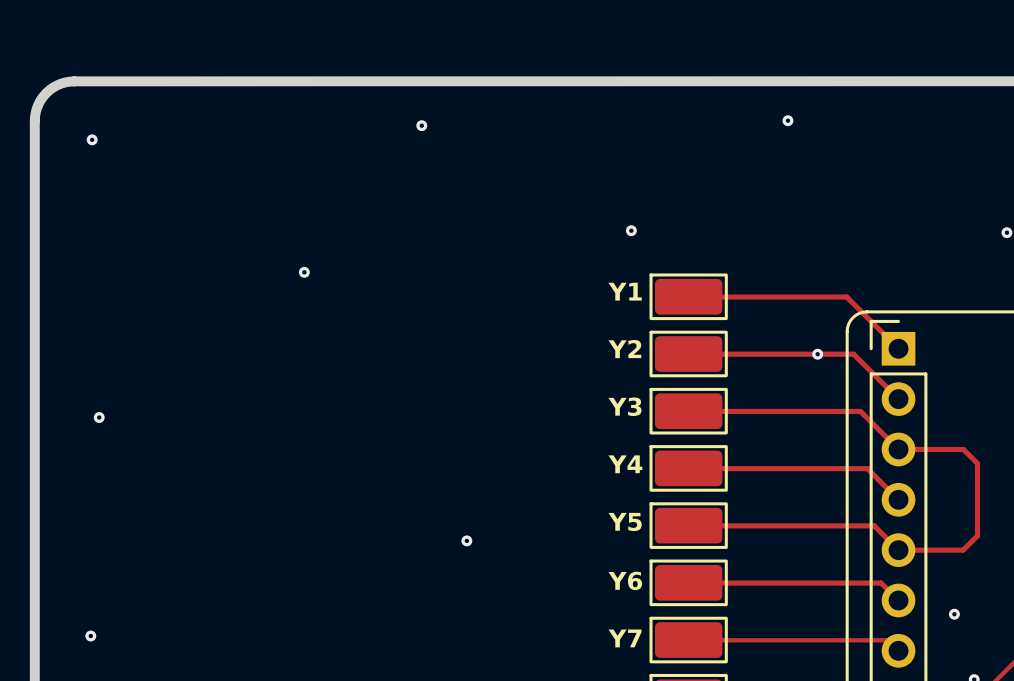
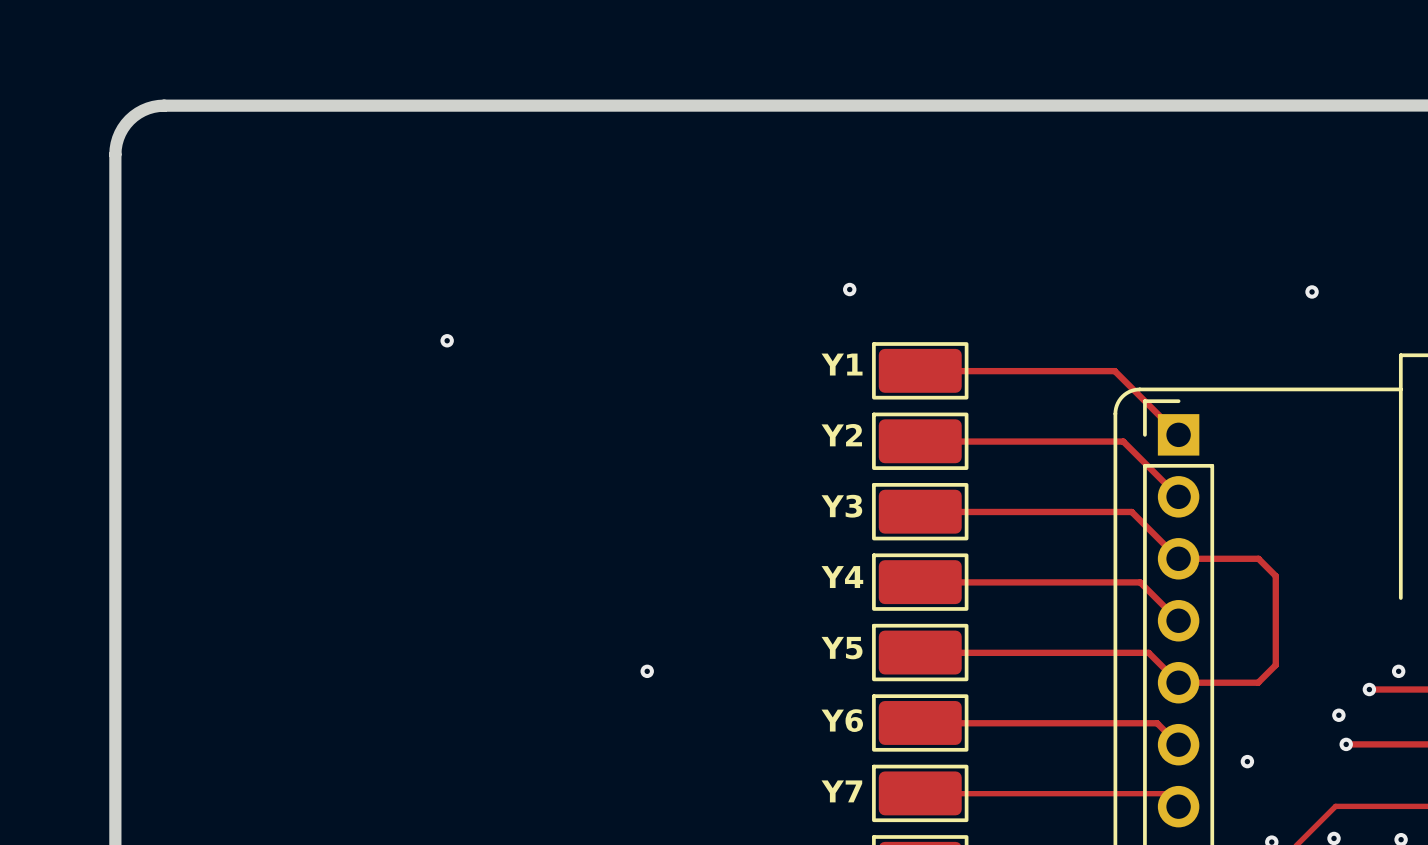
via: (787, 120) -> none
via: (421, 125) -> none
via: (92, 139) -> none
via: (817, 354) -> none
via: (99, 417) -> none
via: (90, 636) -> none

